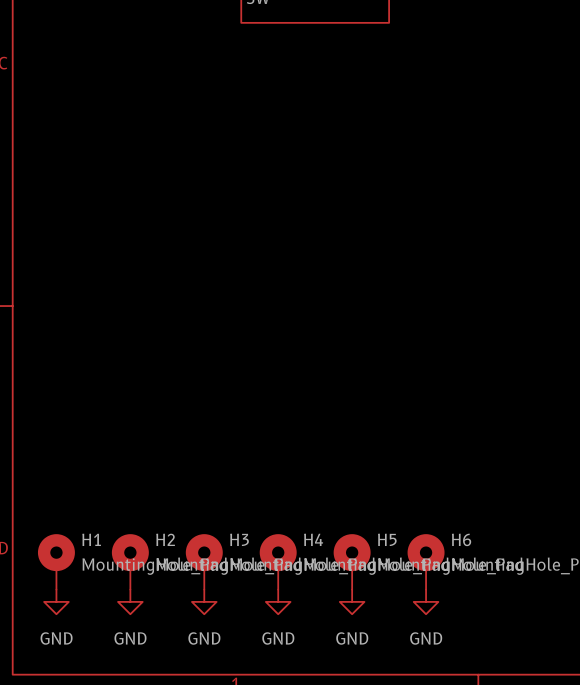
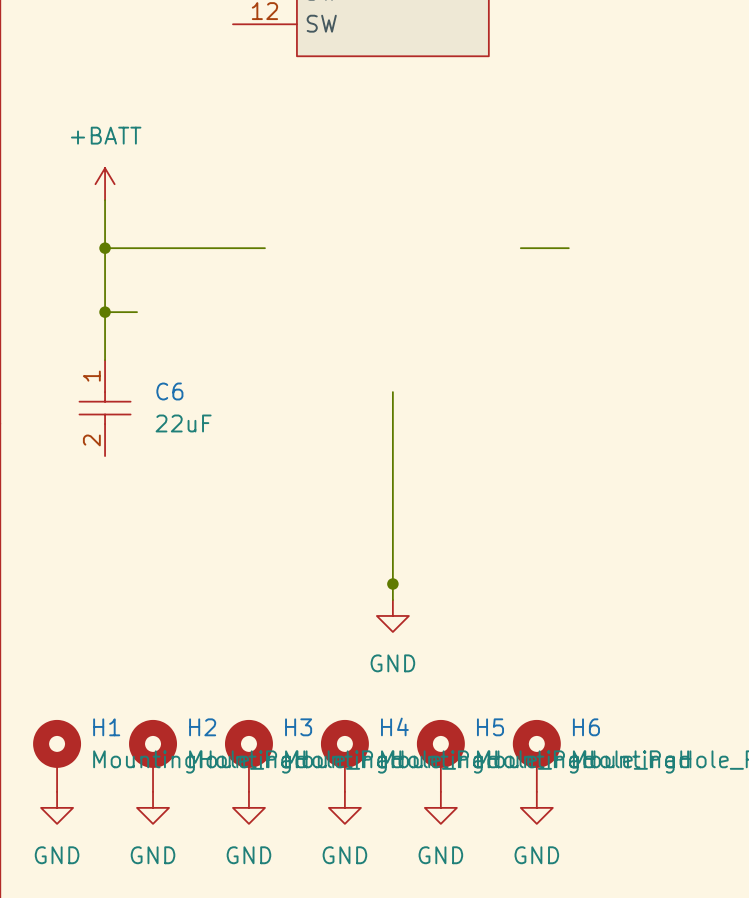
power symbol: none -> +BATT (105, 184)
wire: none -> (105, 200) (105, 360)
wire: none -> (105, 248) (264, 248)
junction: none -> (105, 248)
wire: none -> (520, 248) (568, 248)
wire: none -> (105, 312) (137, 312)
junction: none -> (105, 312)
wire: none -> (392, 392) (392, 599)
C6: none -> 22uF (105, 408)
junction: none -> (392, 584)
power symbol: none -> GND (392, 615)

